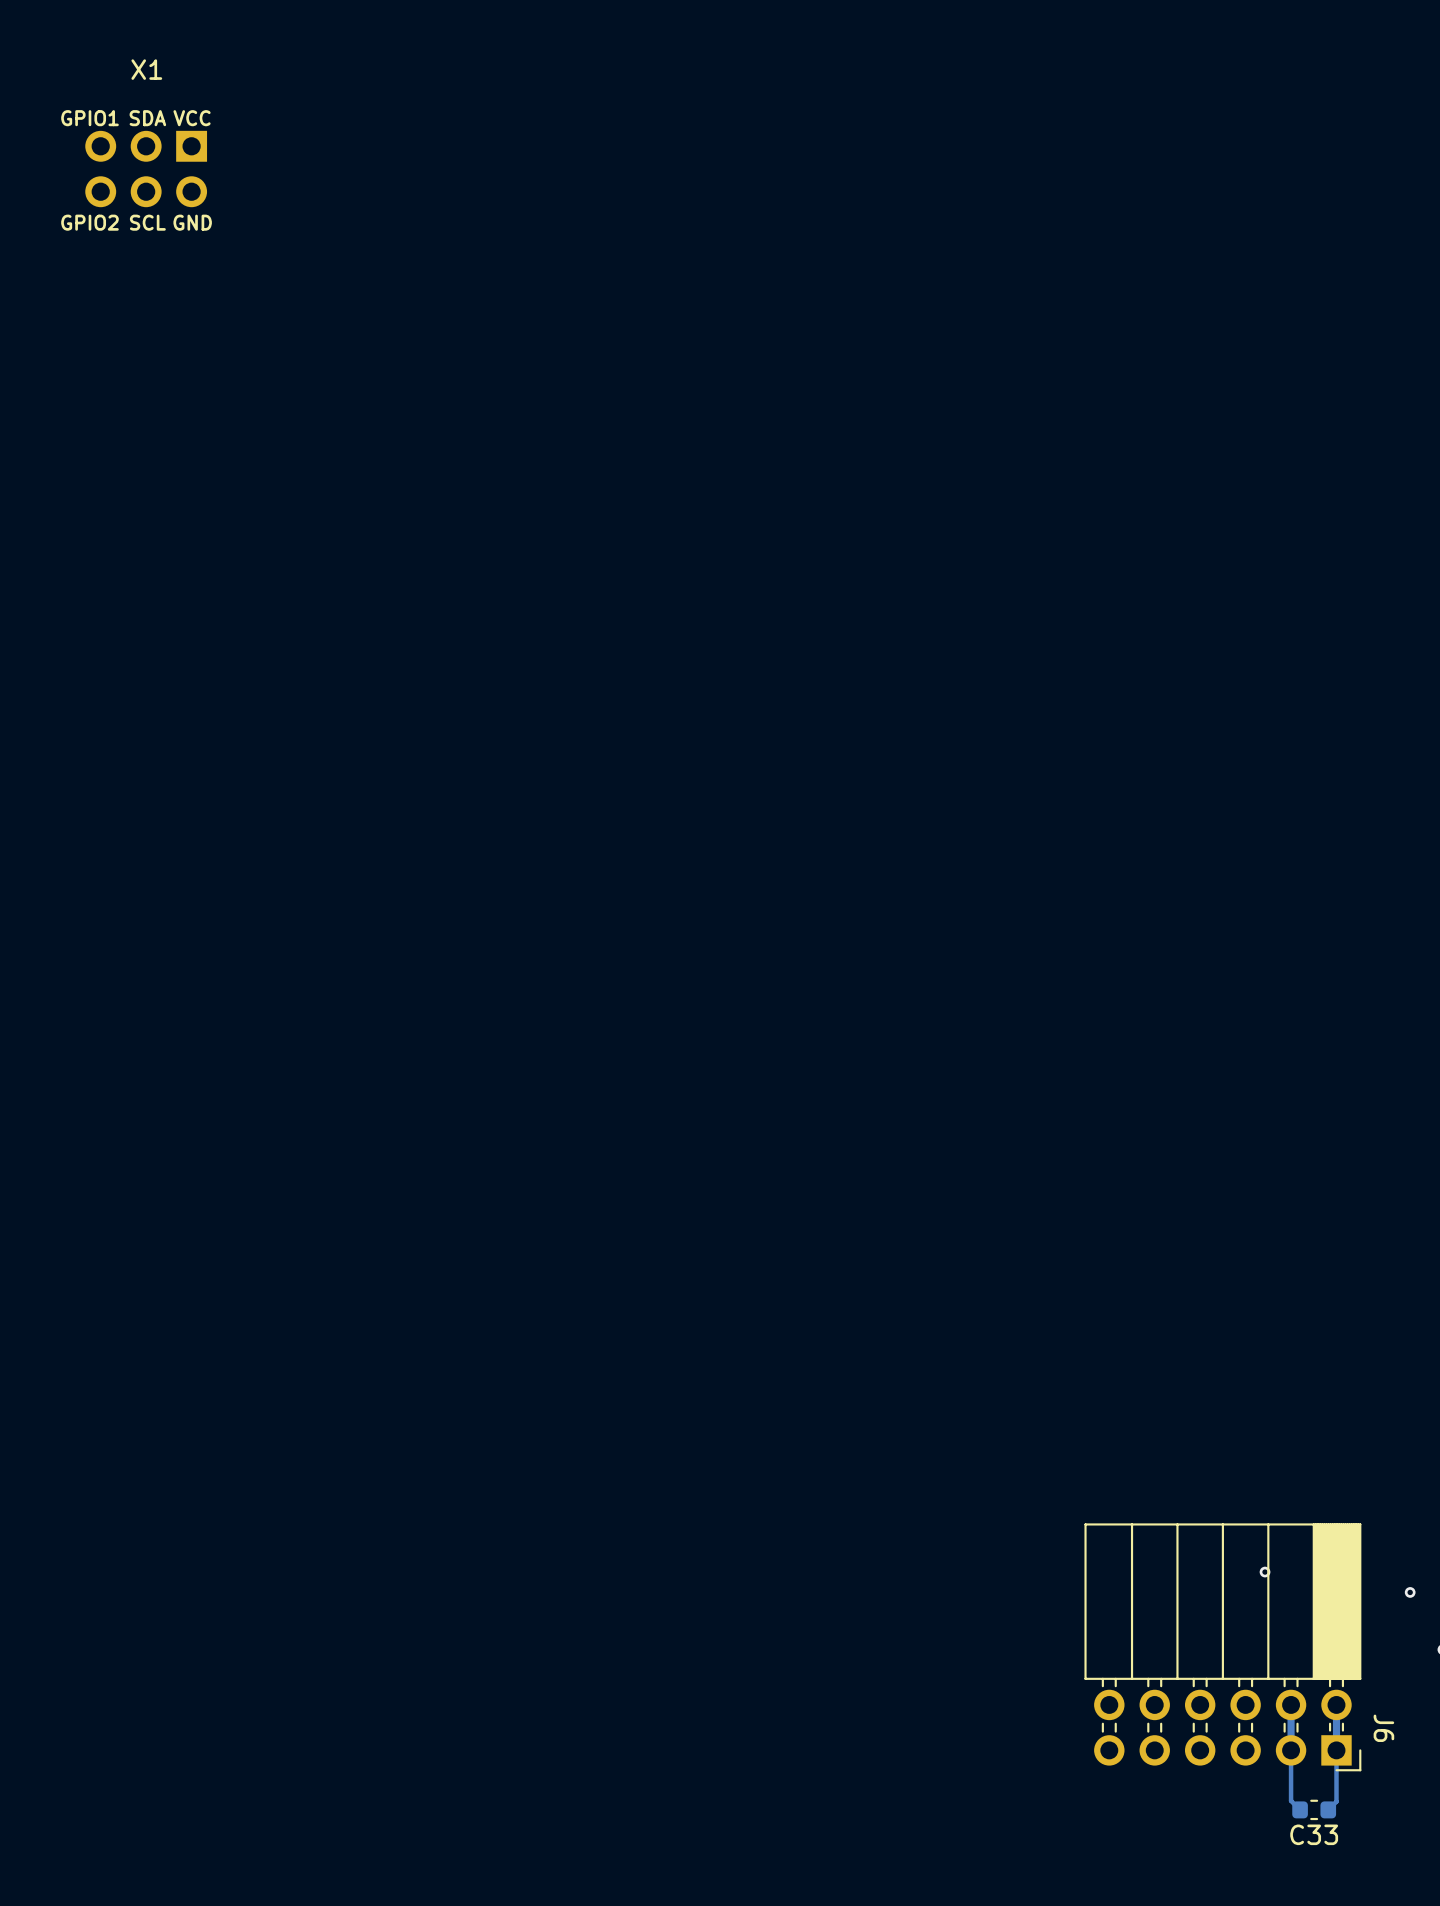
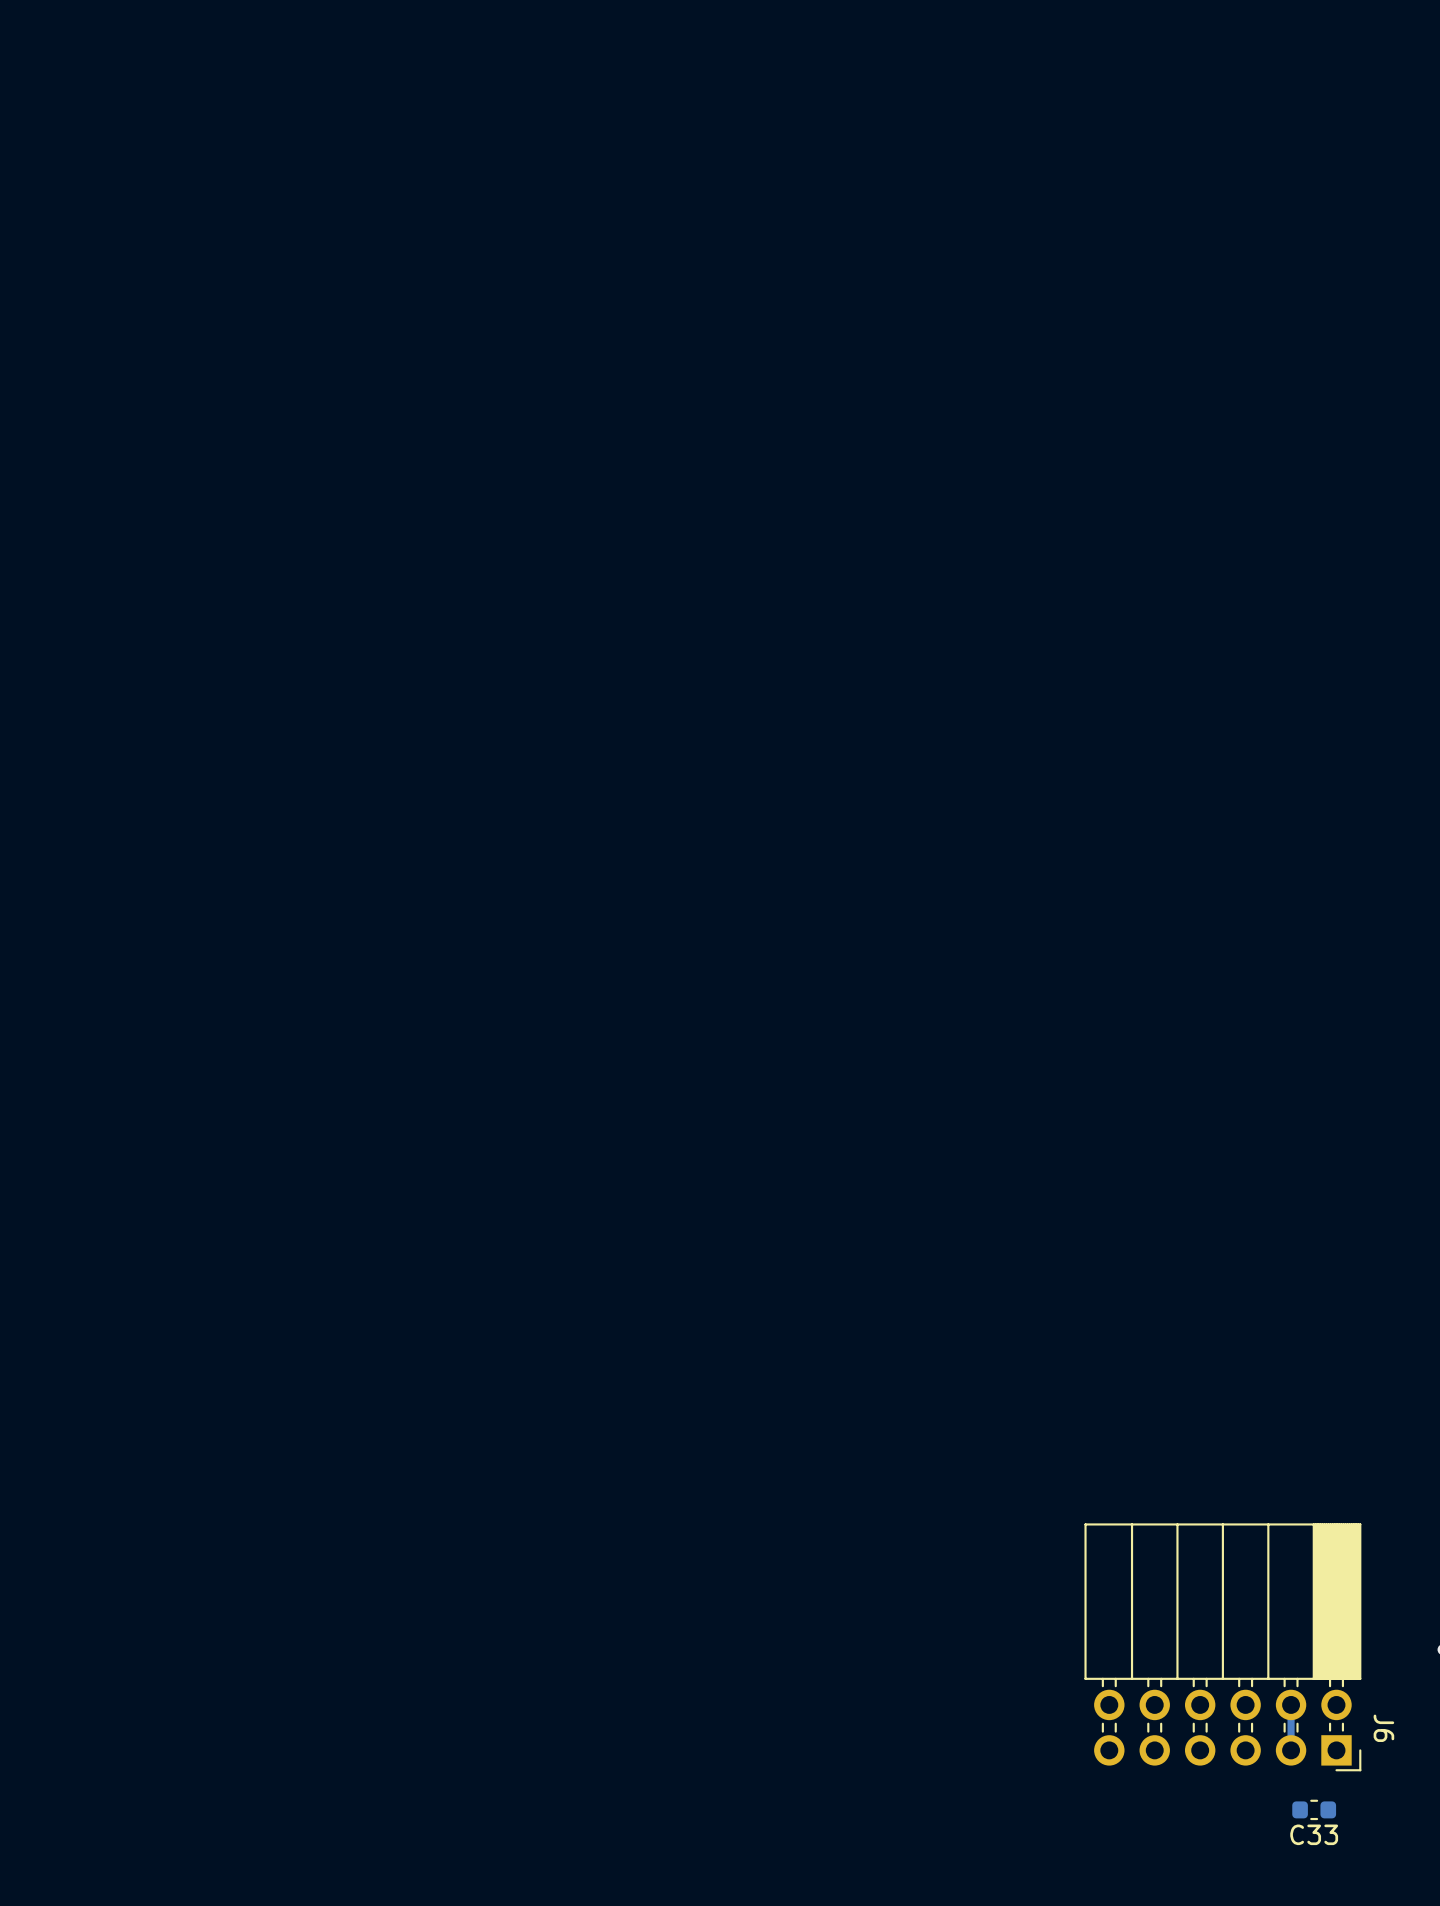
X1: (146, 169) -> none
via: (1265, 1572) -> none
via: (1410, 1592) -> none
track: (1336, 1704) (1336, 1801) (1328, 1809) -> none
track: (1297, 1757) (1291, 1750) (1291, 1800) (1300, 1809) -> none

